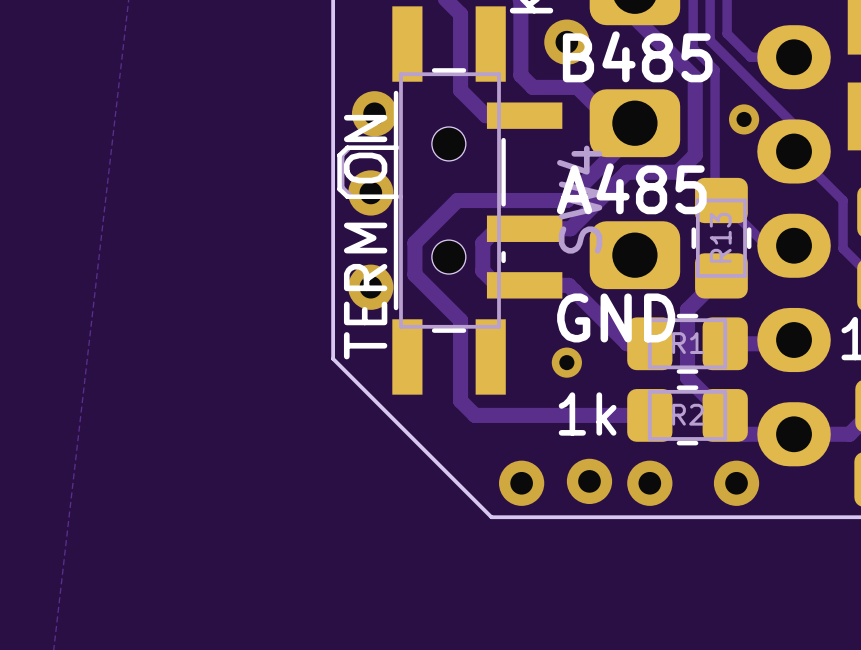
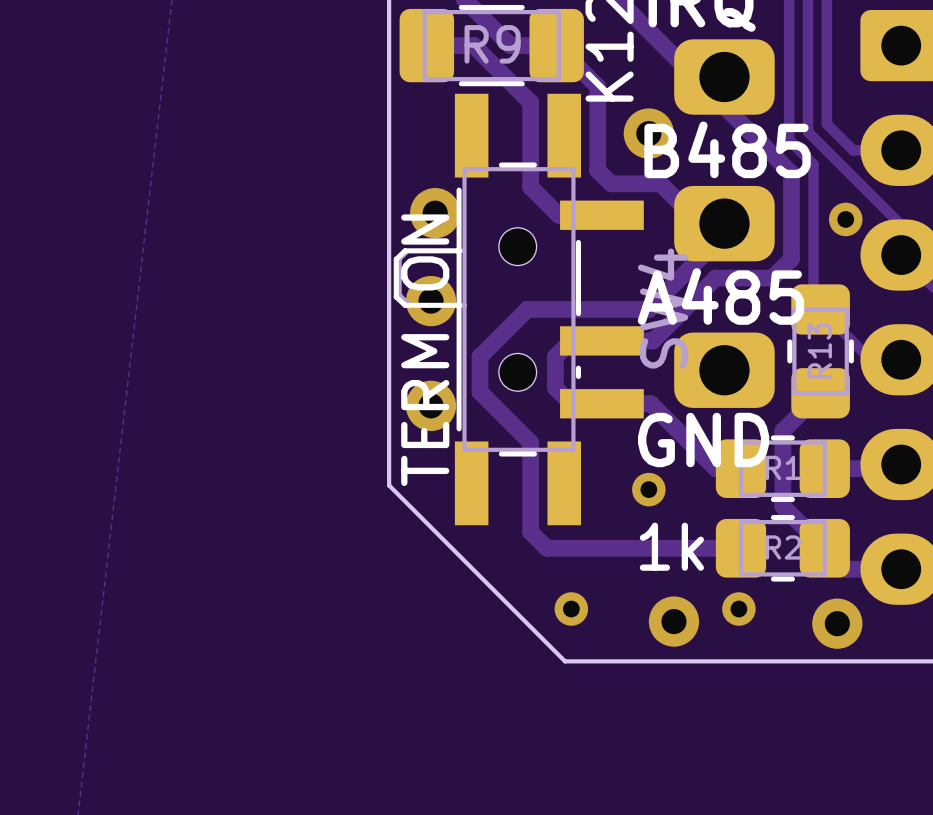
via size: [499, 460, 545, 506] -> [554, 592, 589, 626]
via size: [627, 460, 673, 506] -> [722, 592, 756, 626]

